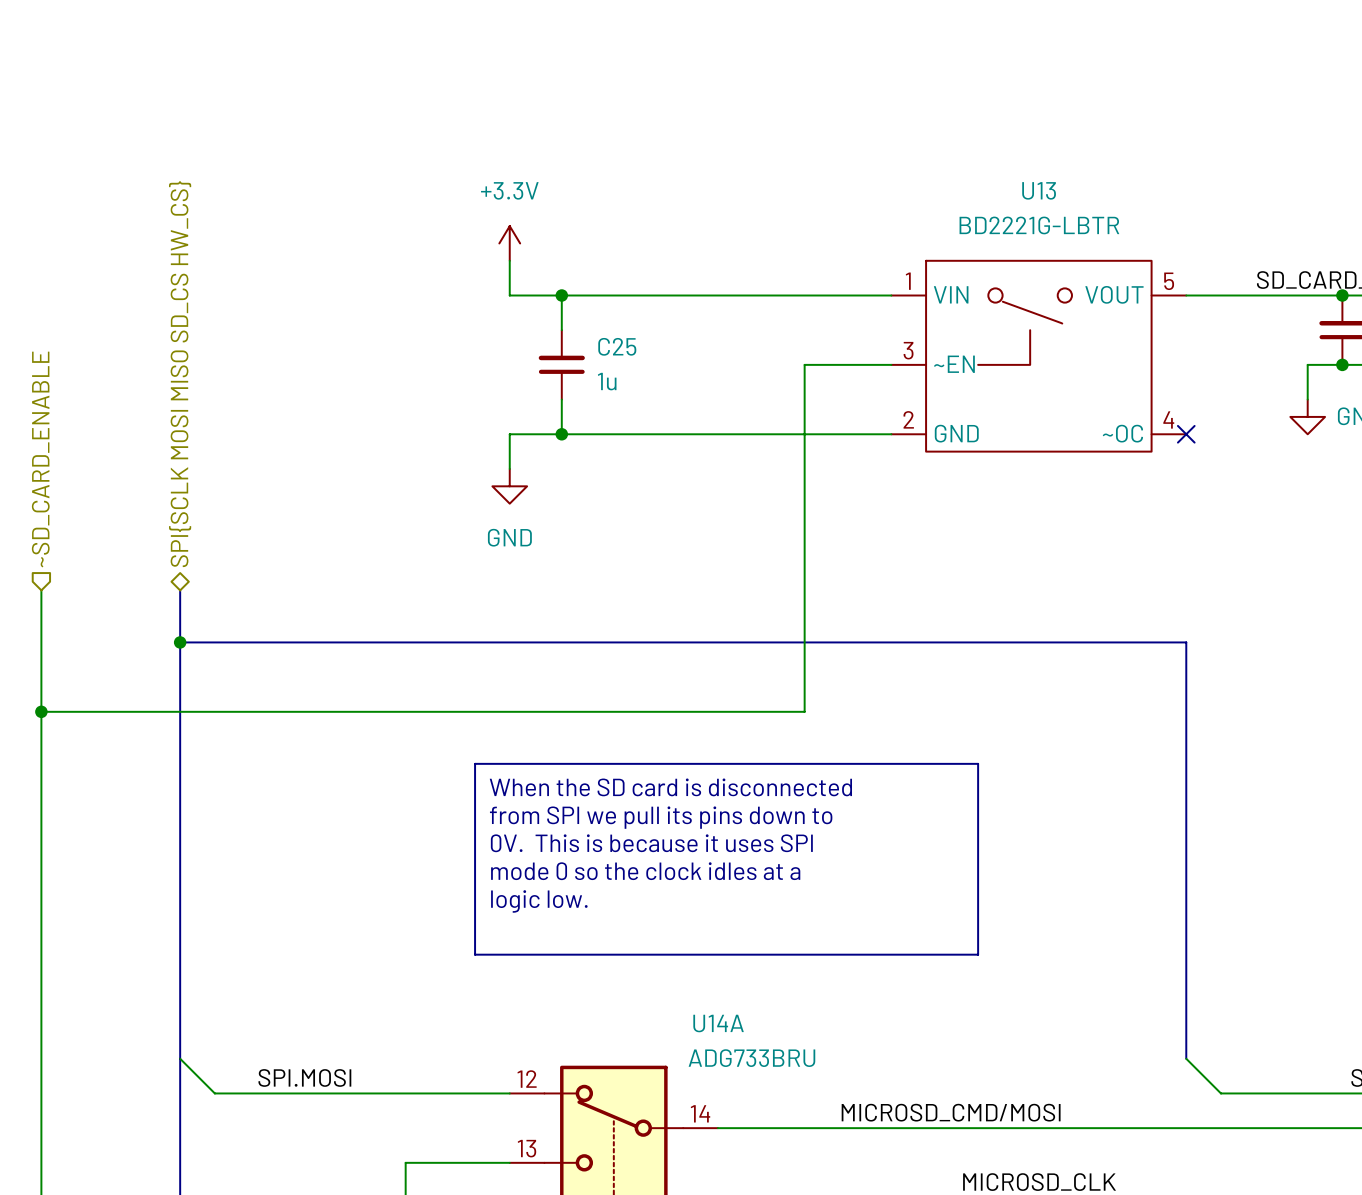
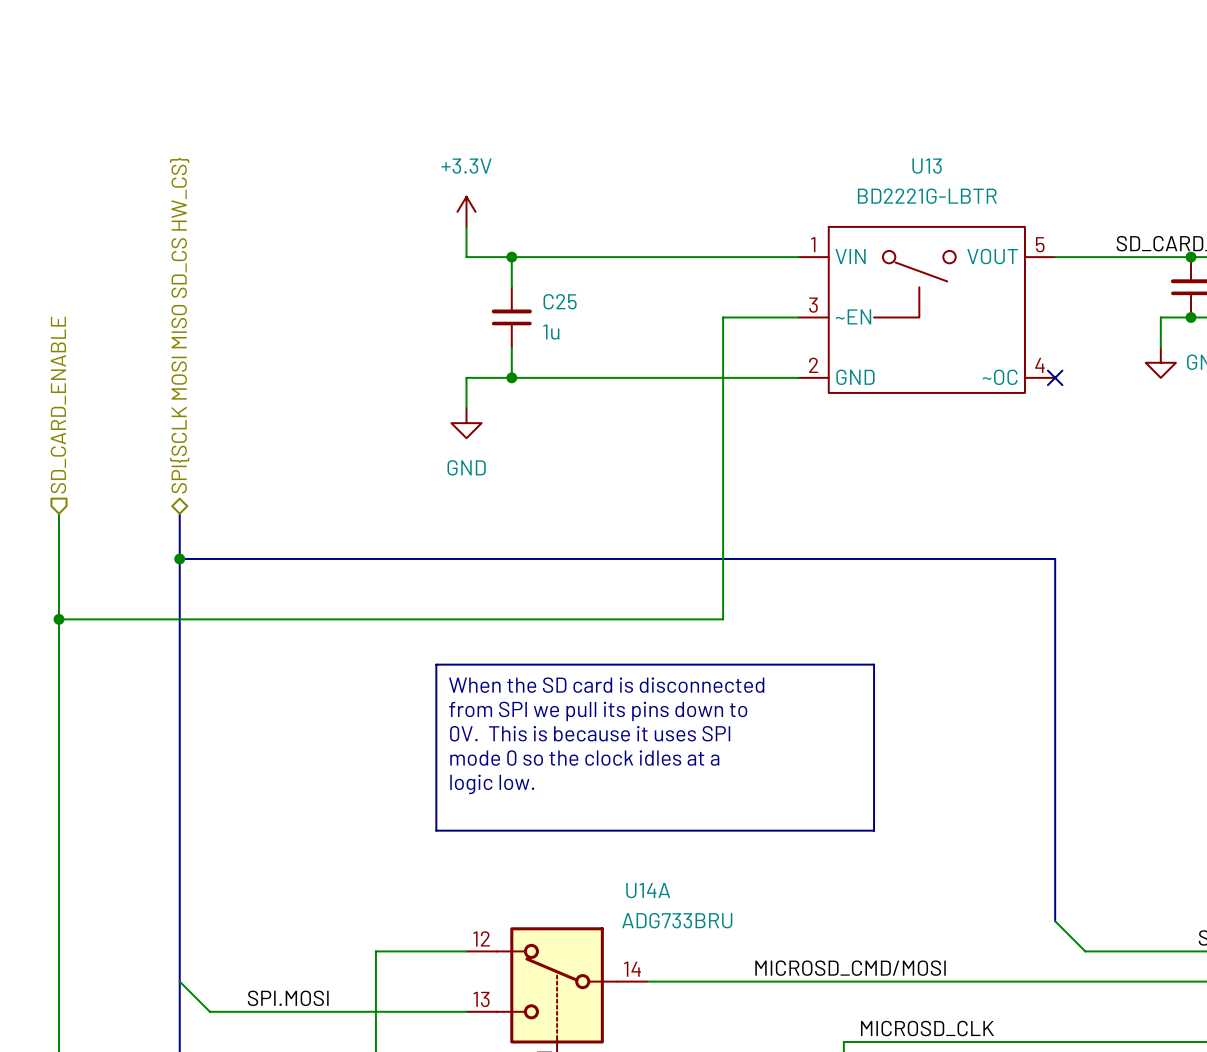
hierarchical label: ~SD_CARD_ENABLE (40, 459) -> SD_CARD_ENABLE (58, 405)
wire: (180, 1058) (214, 1093) (405, 1093) -> (179, 981) (209, 1011) (375, 1011) (375, 951)
label position: SPI.MOSI (304, 1077) -> SPI.MOSI (288, 998)

